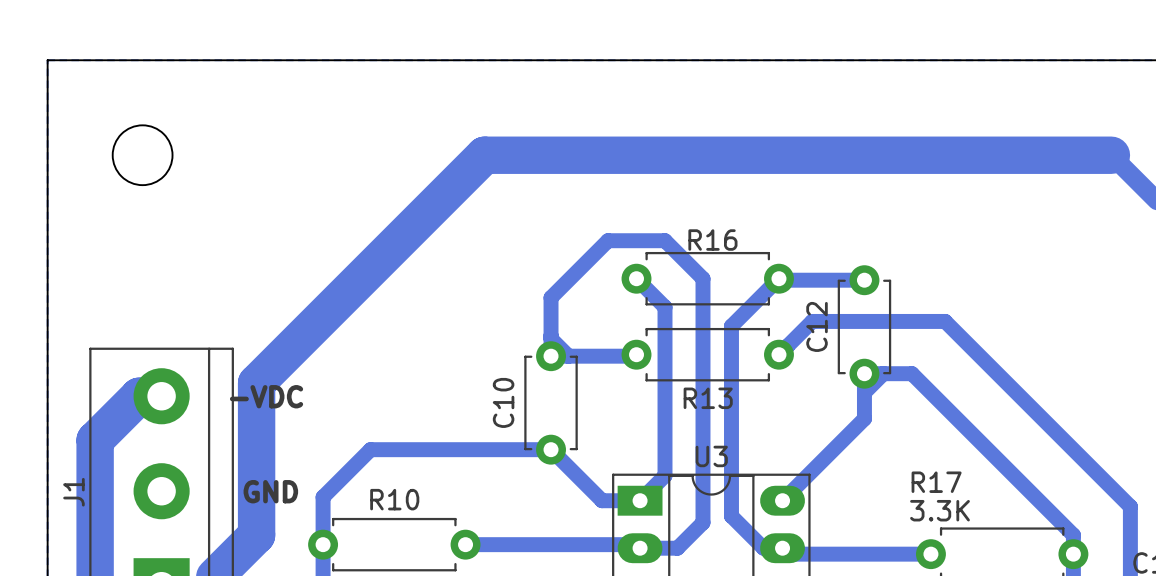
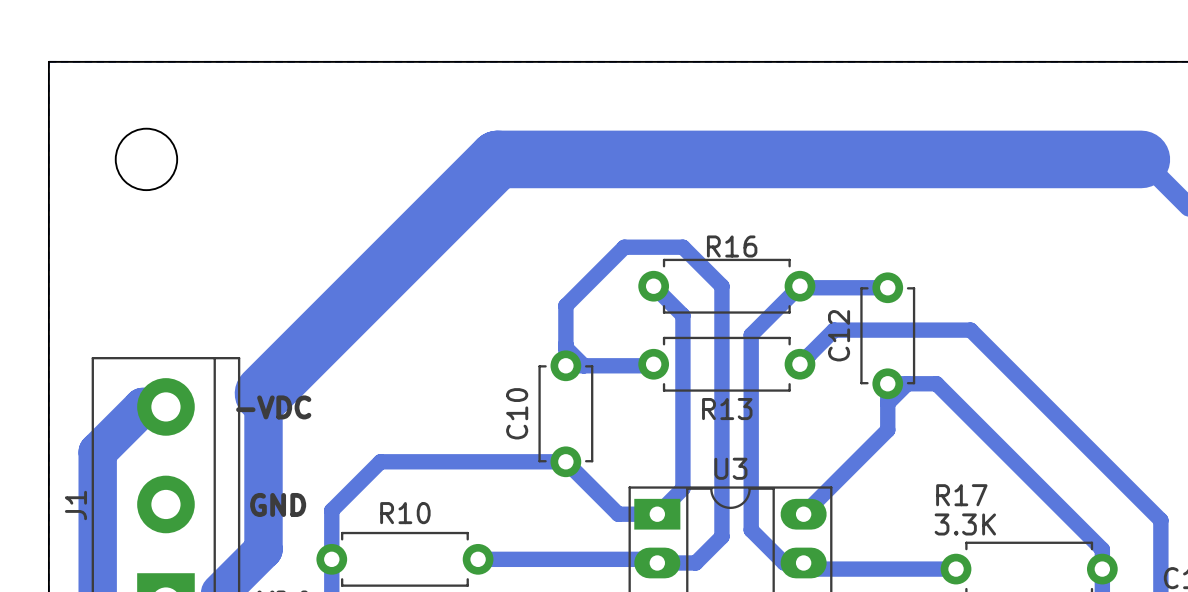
bottom track width: thin (1111, 155) (484, 155) (256, 383) -> thick (1141, 159) (497, 159) (263, 393)

